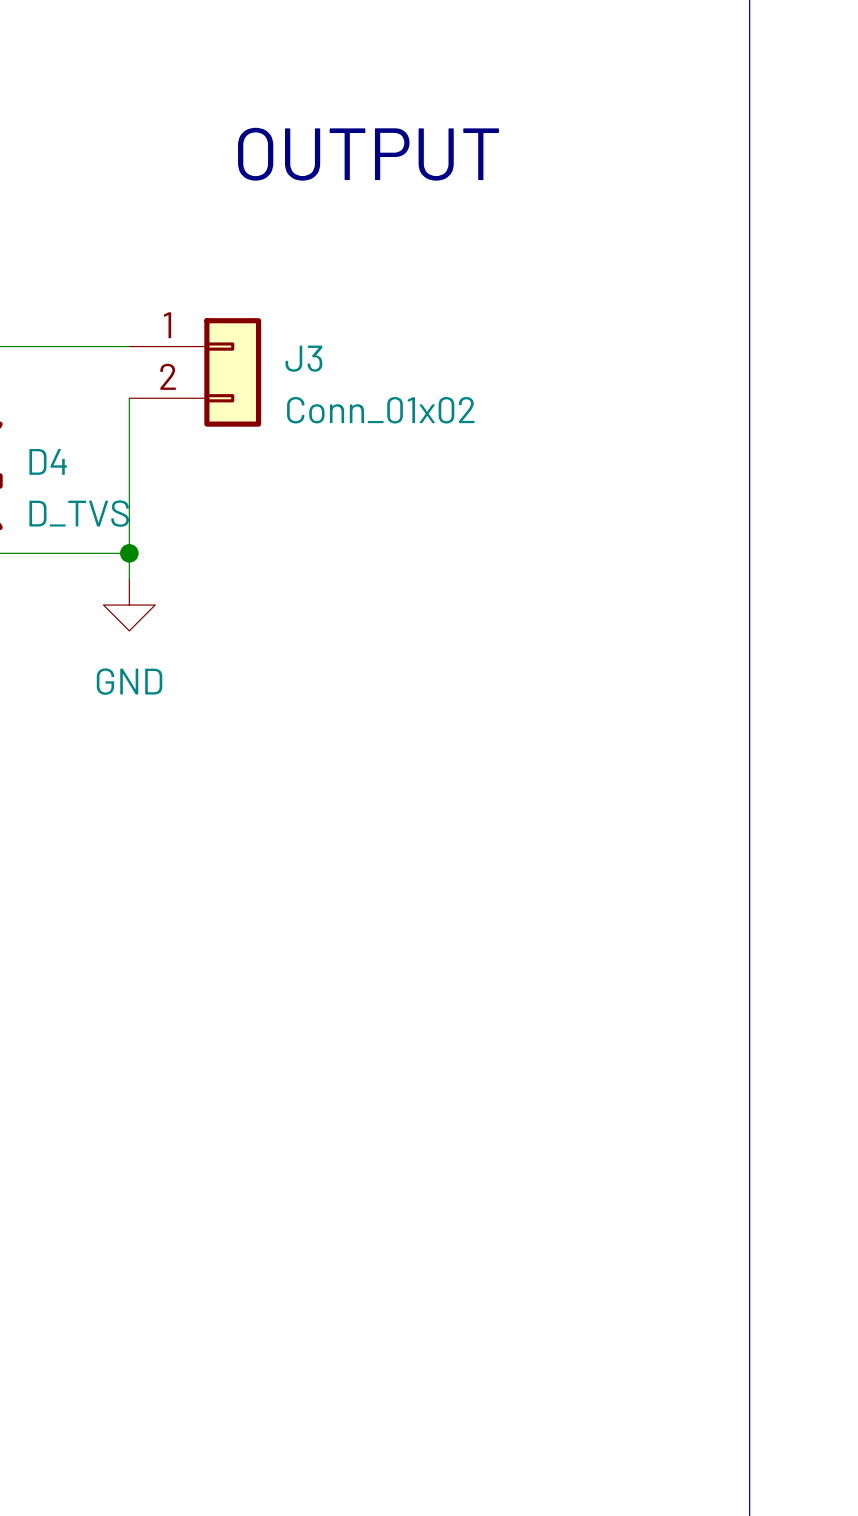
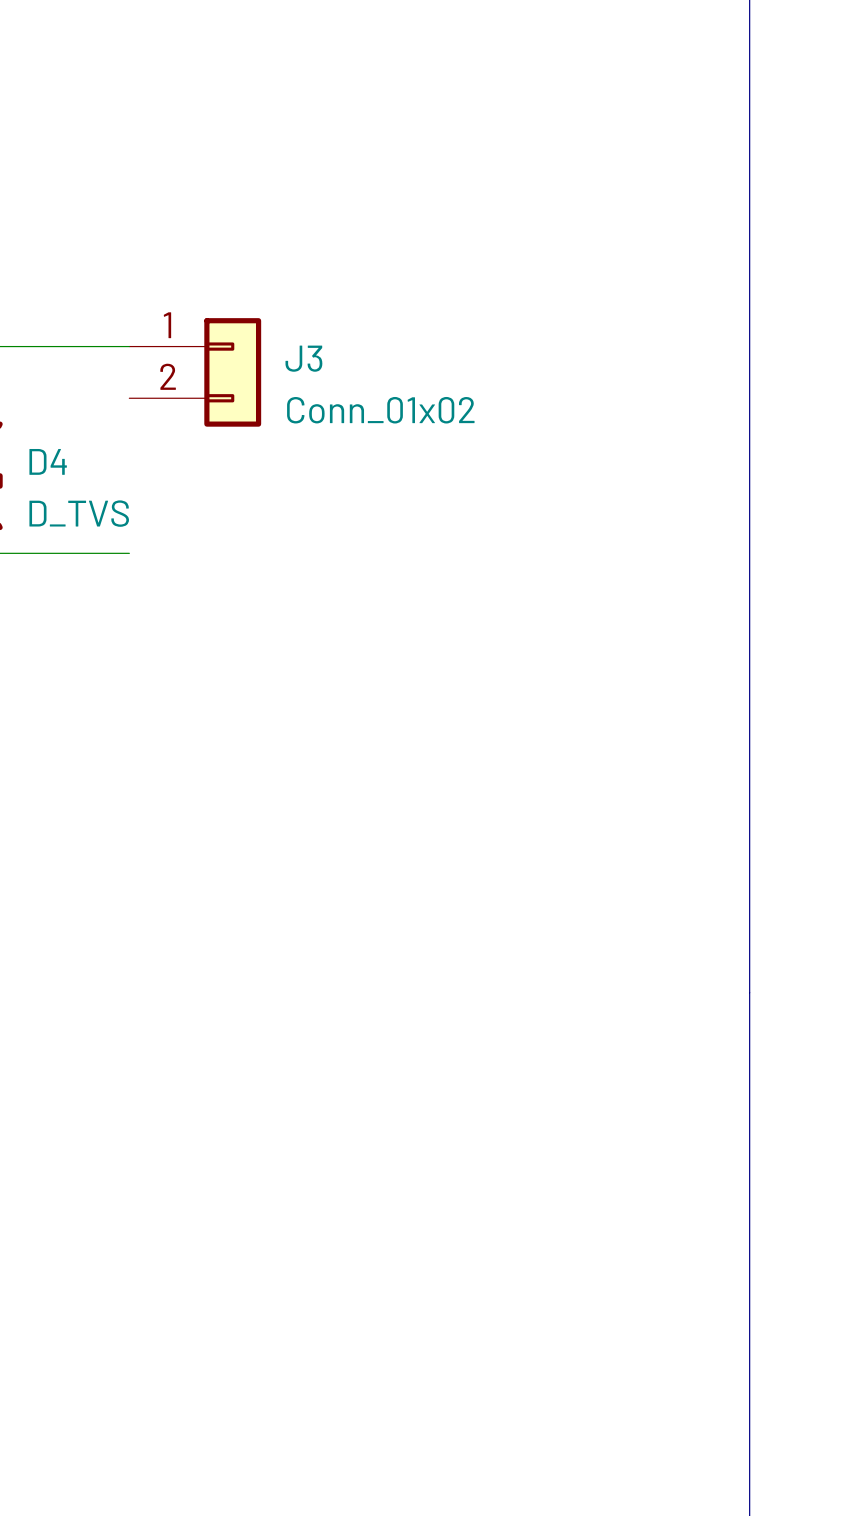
text: OUTPUT (368, 154) -> none
wire: (129, 398) (129, 579) -> none
junction: (129, 553) -> none
power symbol: GND (129, 605) -> none

